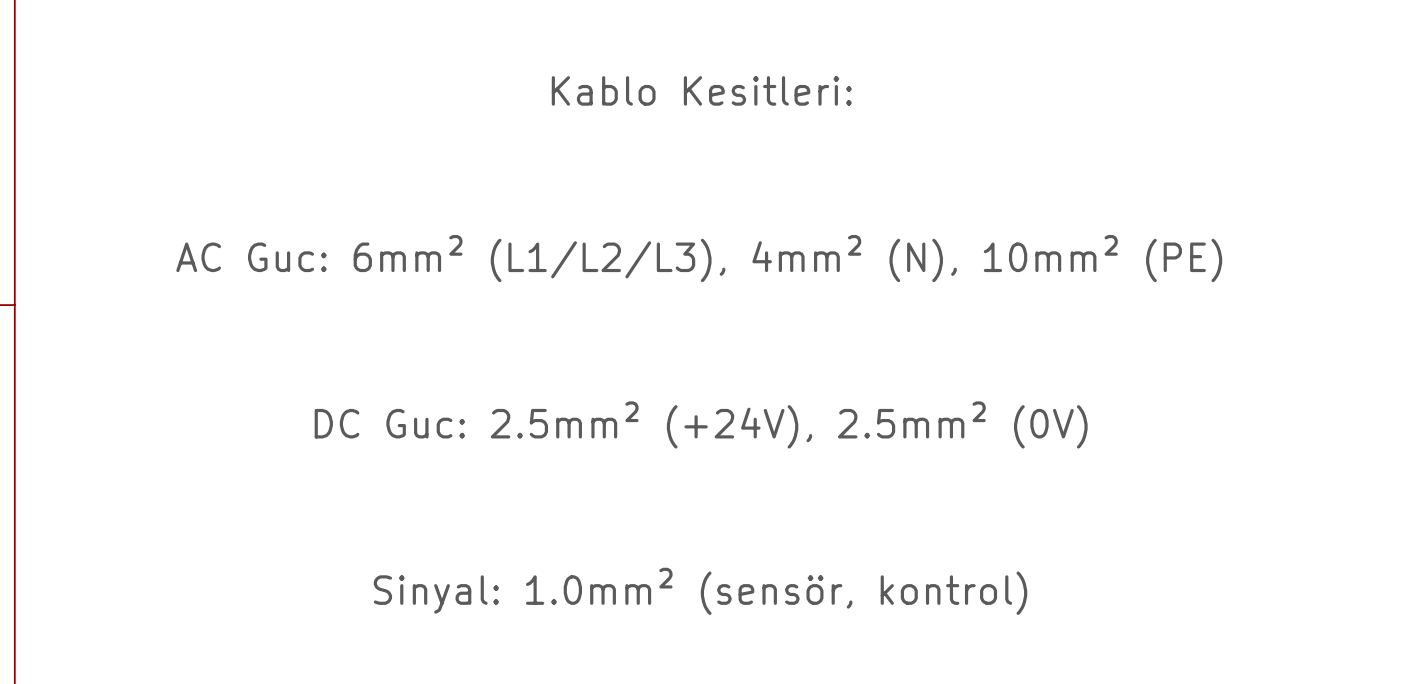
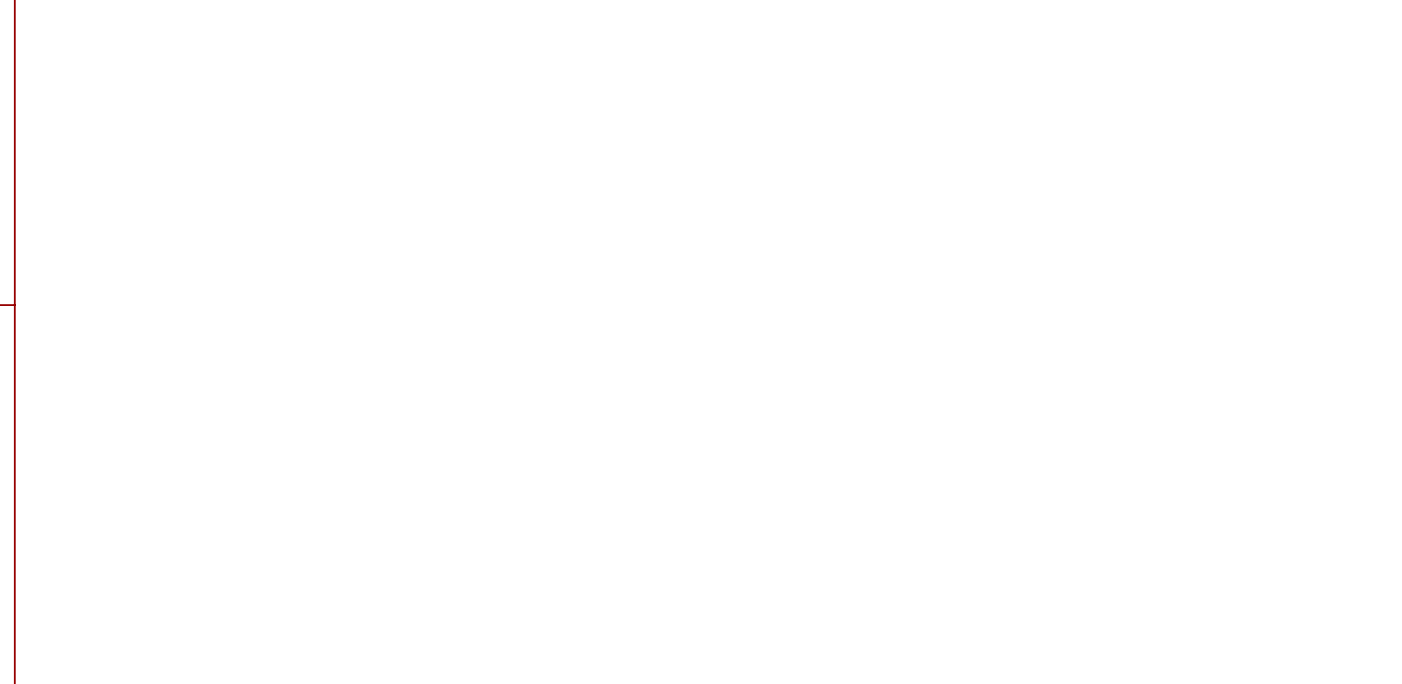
text: Kablo Kesitleri: (701, 90) -> none
text: AC Guc: 6mm² (L1/L2/L3), 4mm² (N), 10mm² (PE) (699, 258) -> none
text: DC Guc: 2.5mm² (+24V), 2.5mm² (0V) (701, 424) -> none
text: Sinyal: 1.0mm² (sensör, kontrol) (700, 591) -> none

